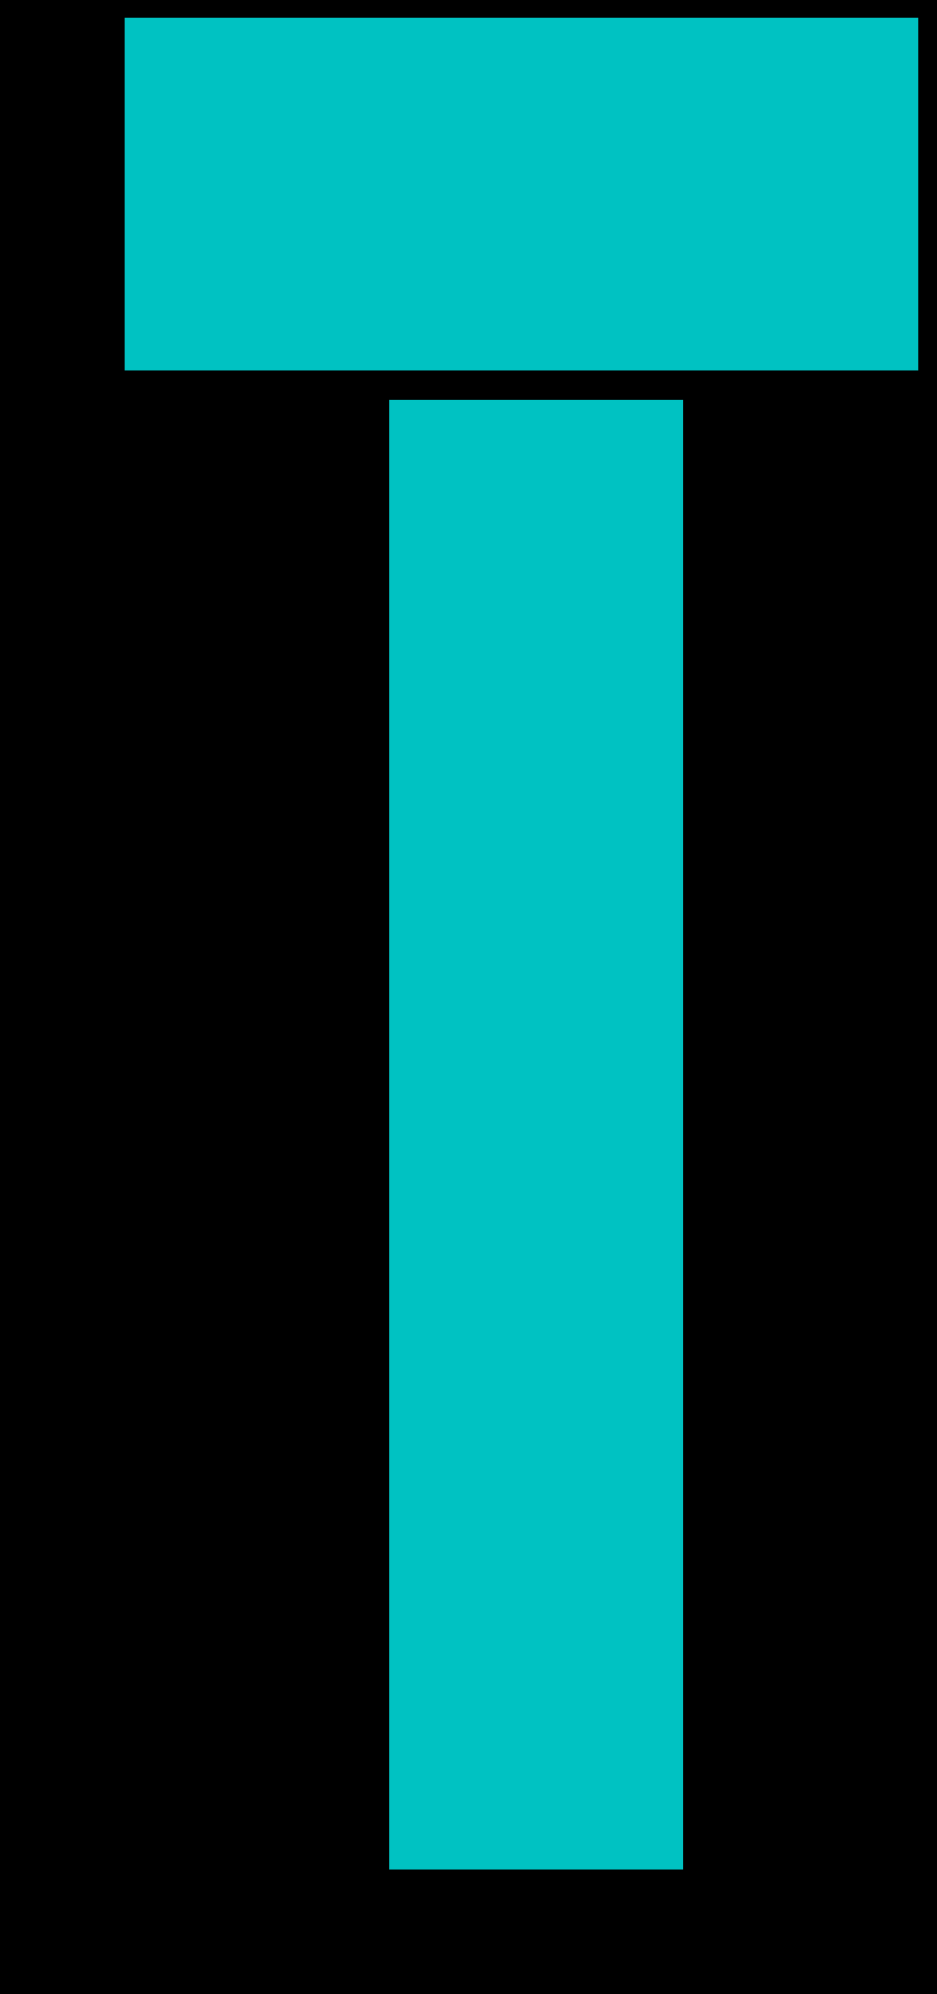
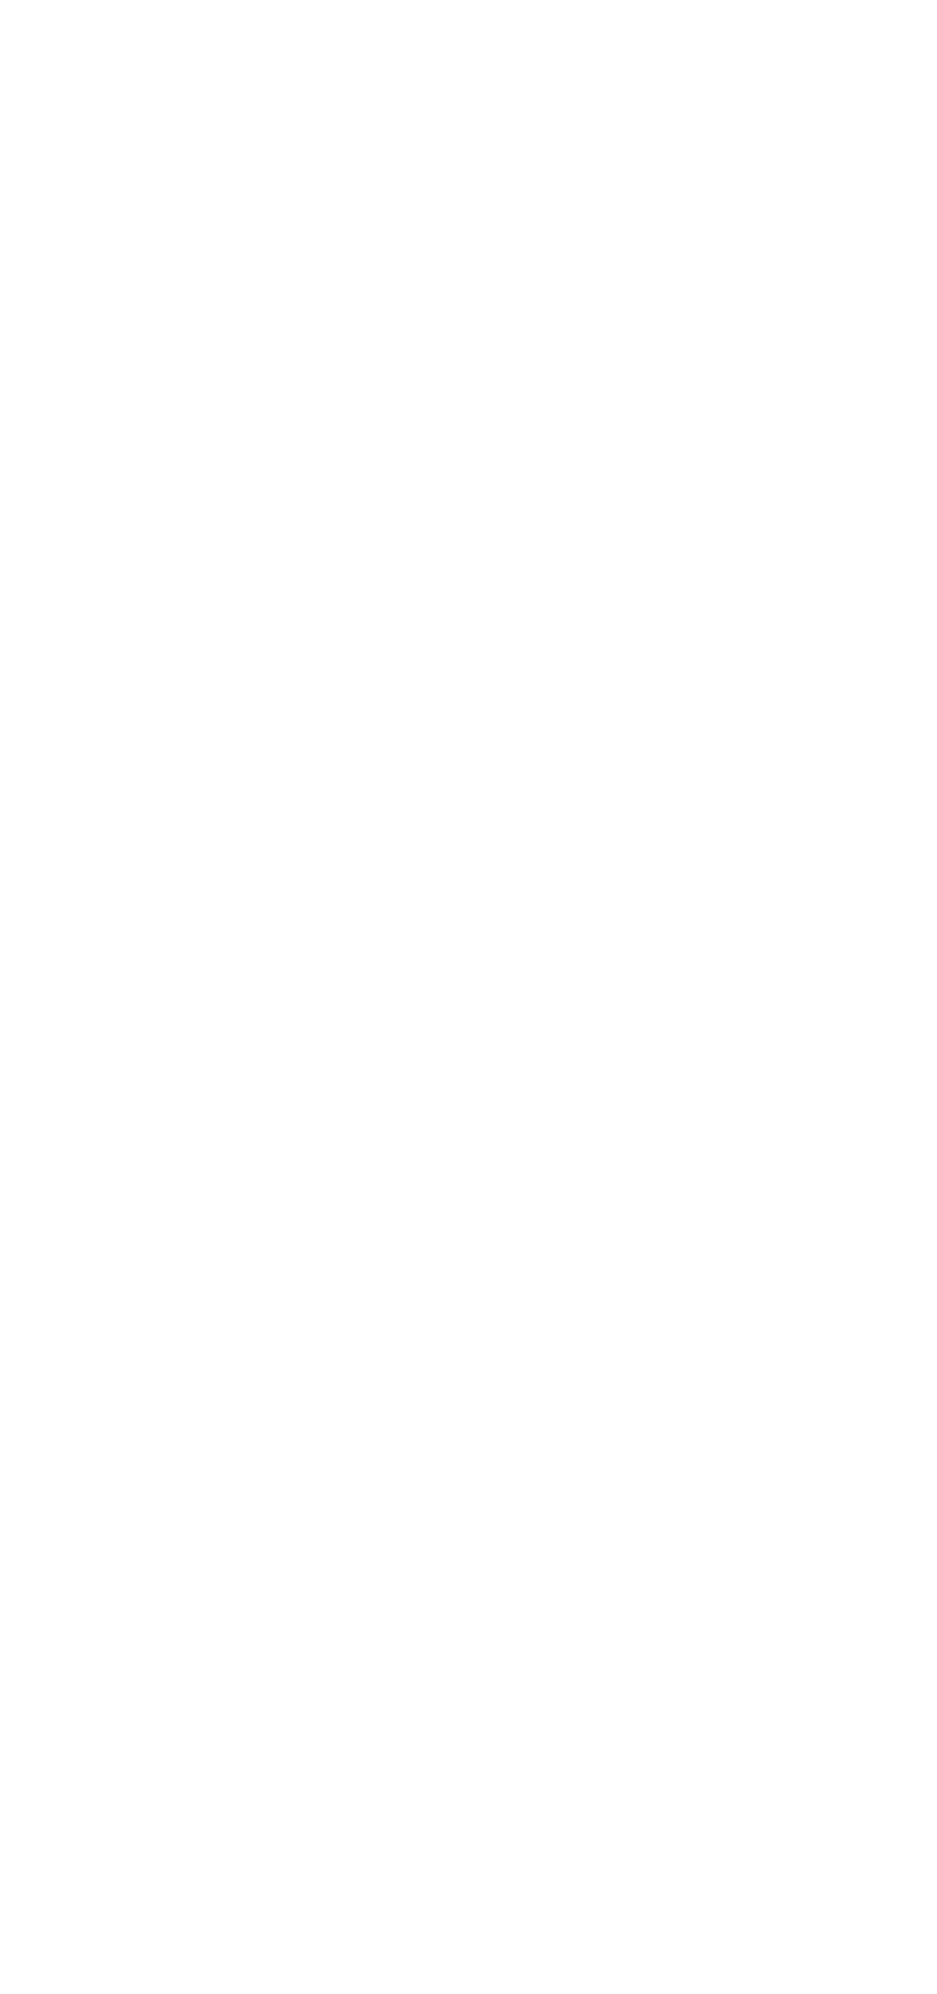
drawing: [124, 17, 919, 1870] -> none

